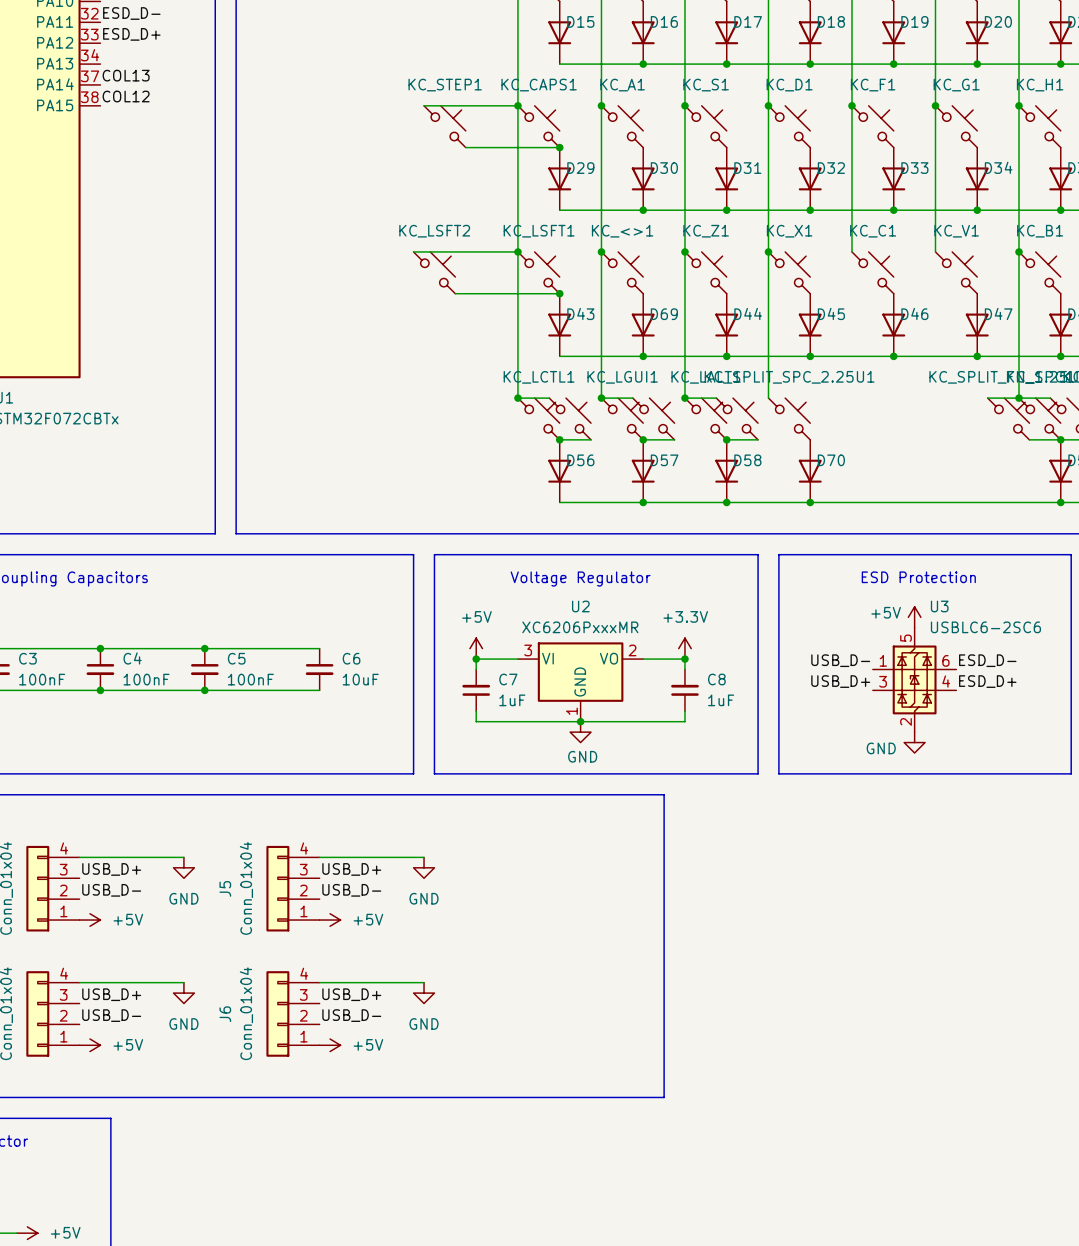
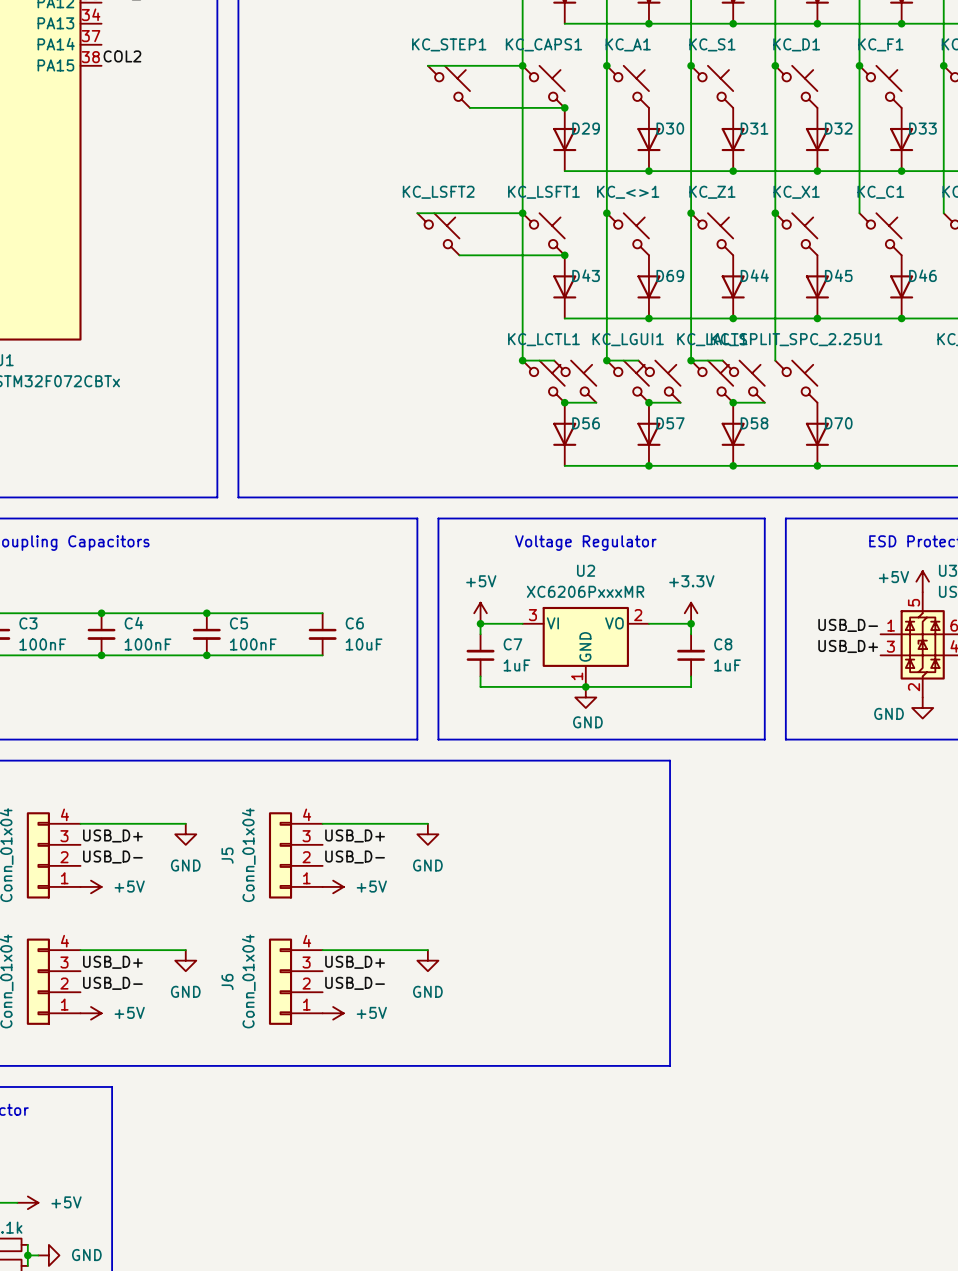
label: COL13 (126, 75) -> none
label: COL12 (126, 96) -> COL2 (122, 56)

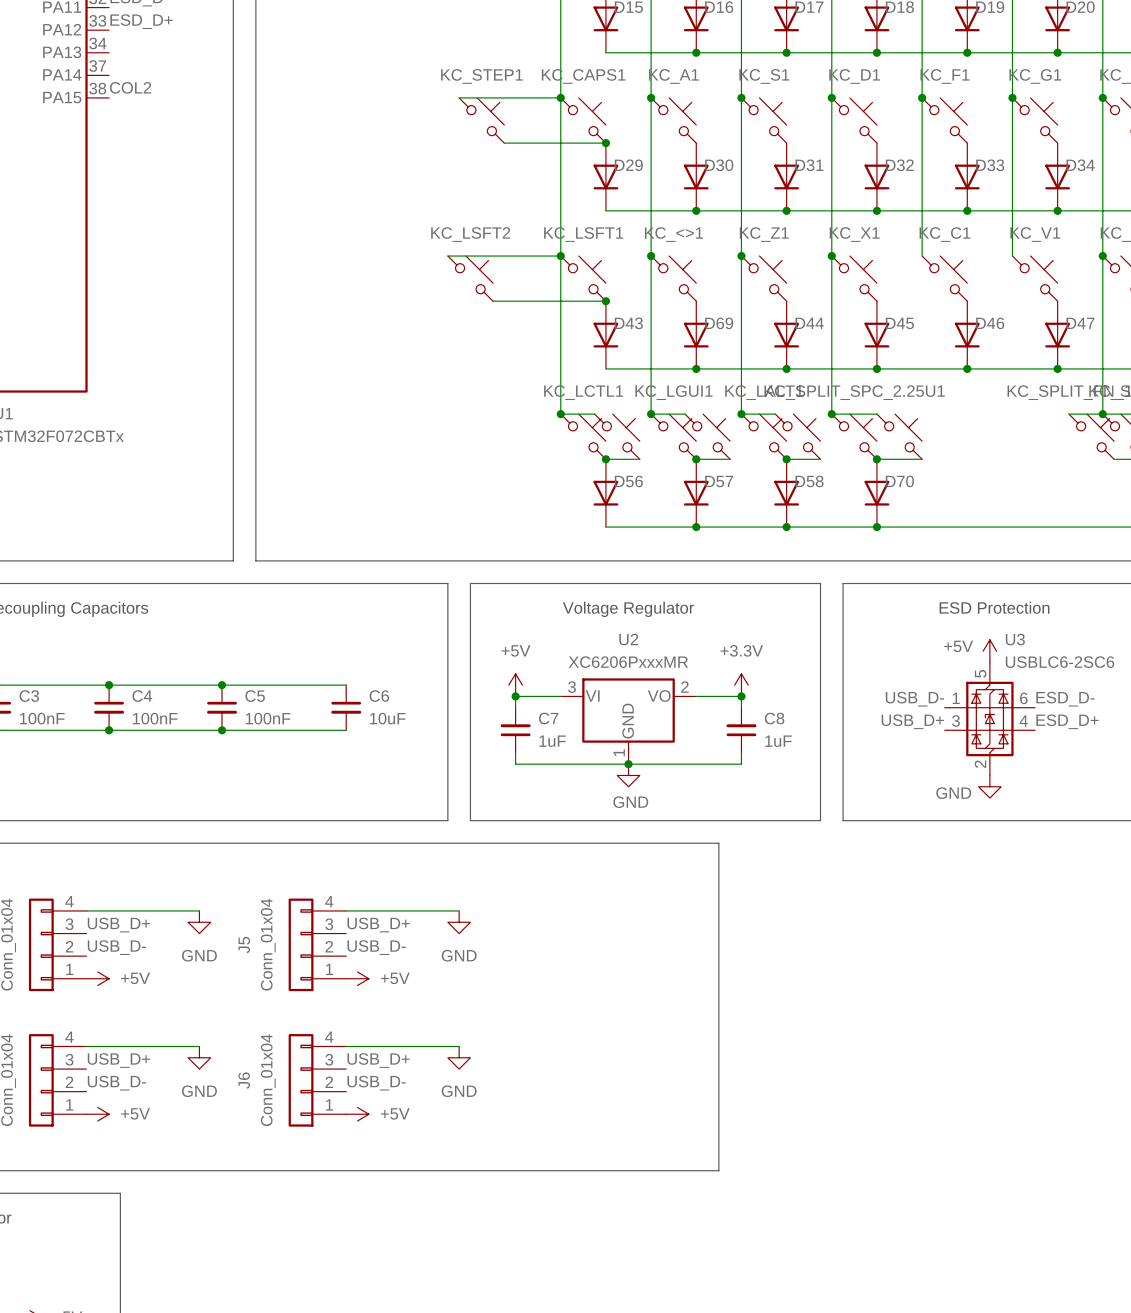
wire: none -> (831, 414) (876, 414)
junction: none -> (831, 414)
part: none -> (899, 436)
wire: none -> (876, 459) (922, 459)
junction: none -> (876, 459)

